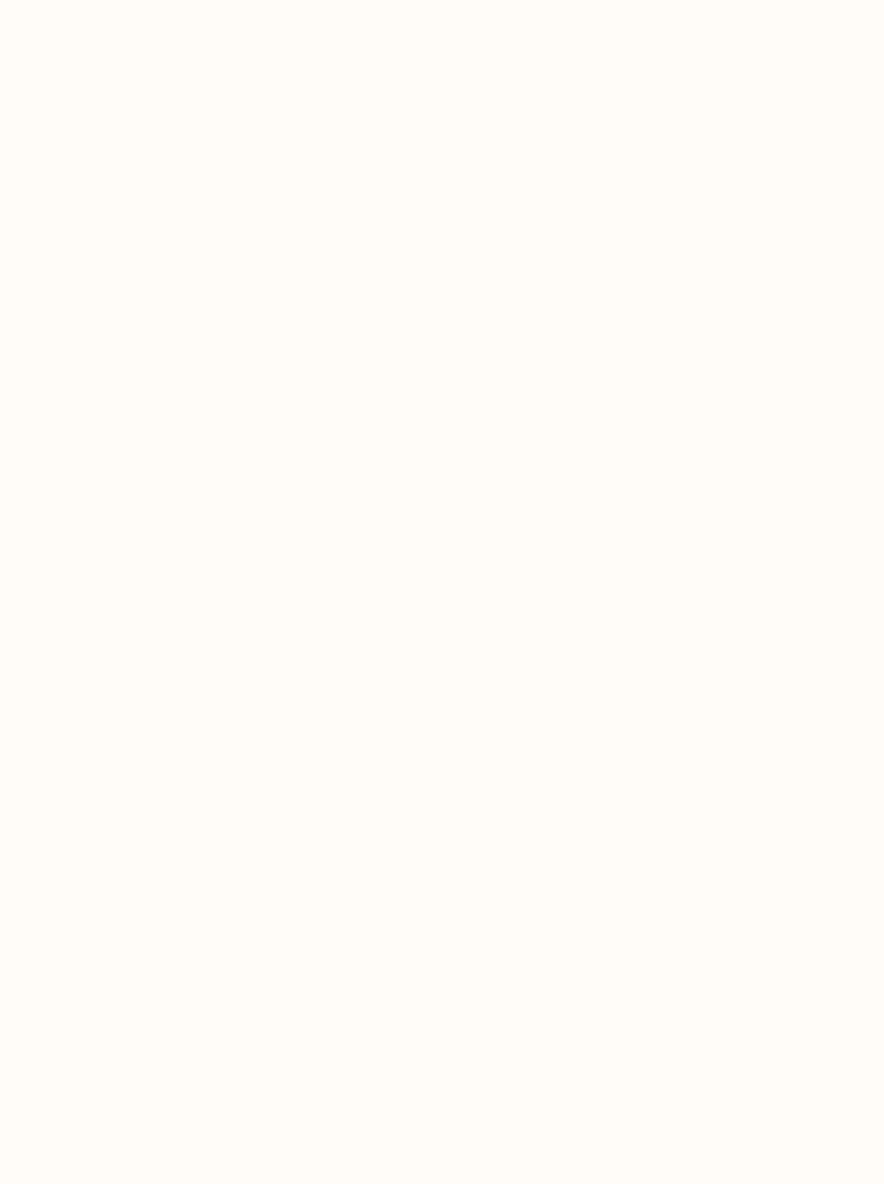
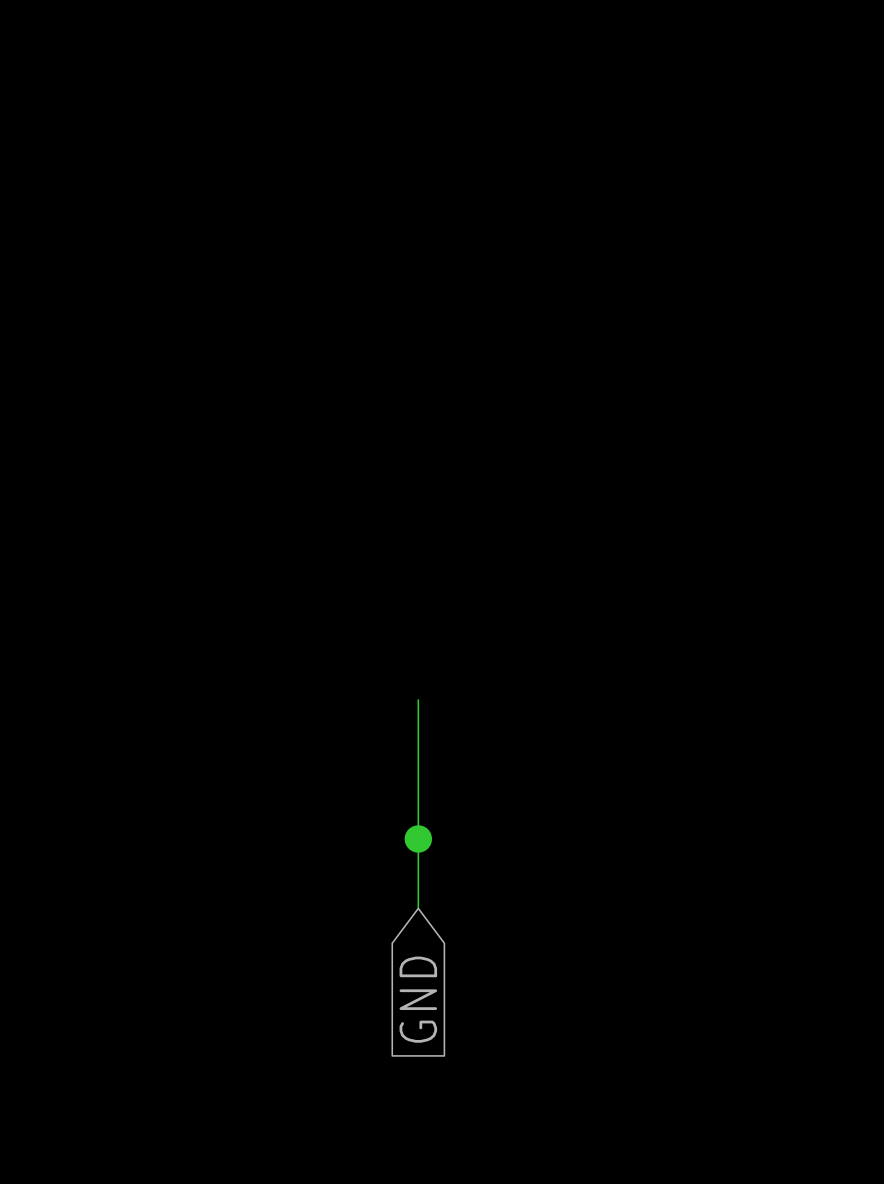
wire: none -> (418, 699) (418, 908)
junction: none -> (418, 838)
global label: none -> GND (418, 999)

